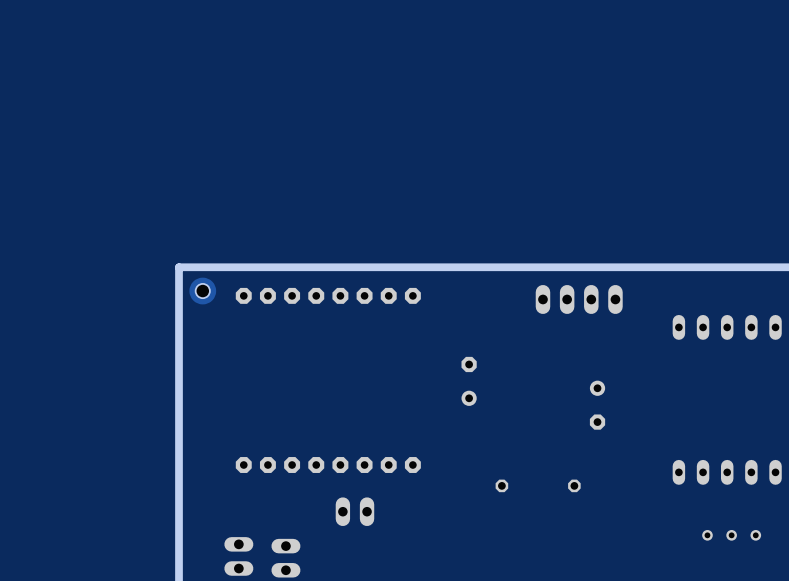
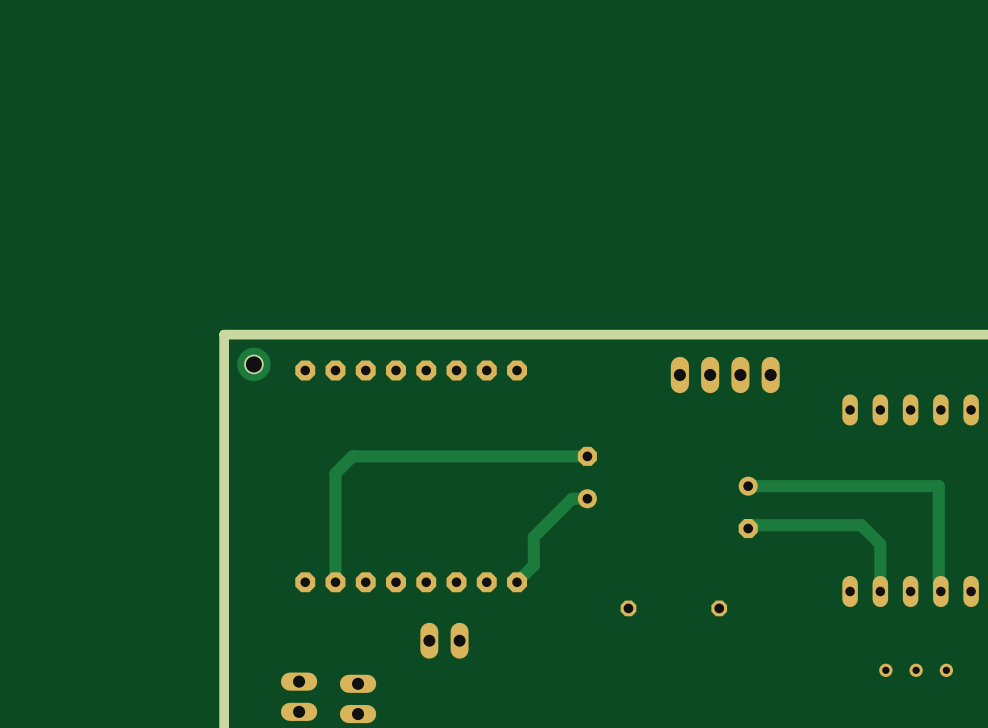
track: none -> (587, 456) (352, 456) (335, 473) (335, 582)
track: none -> (748, 486) (938, 486) (938, 589) (940, 591)
track: none -> (587, 498) (572, 498) (533, 537) (533, 565) (517, 582)
track: none -> (748, 528) (751, 525) (861, 525) (880, 544) (880, 591)

